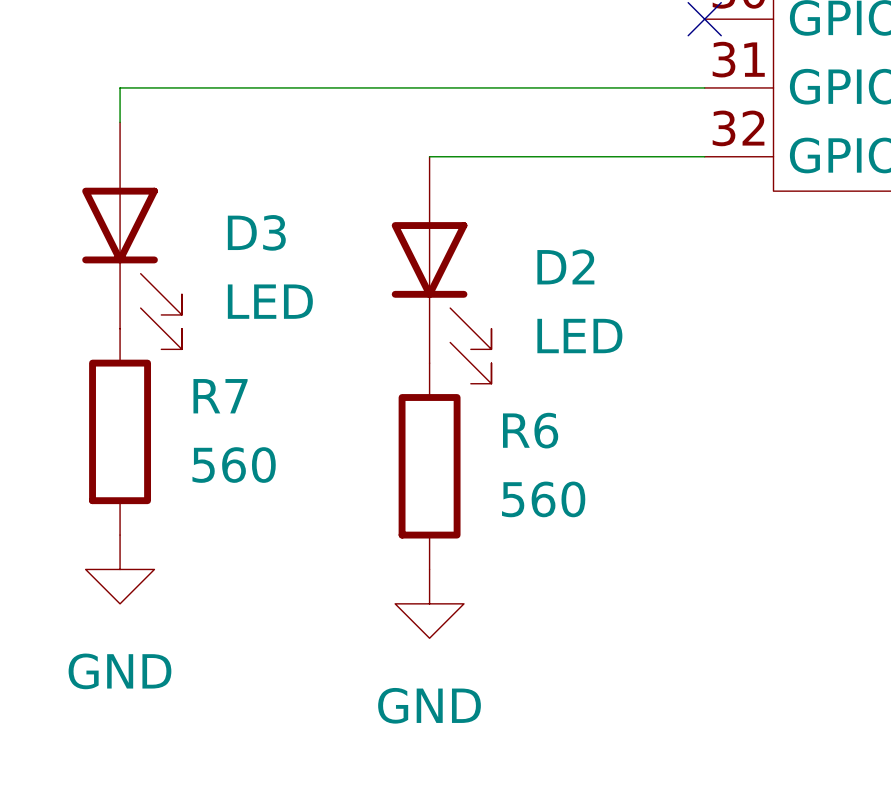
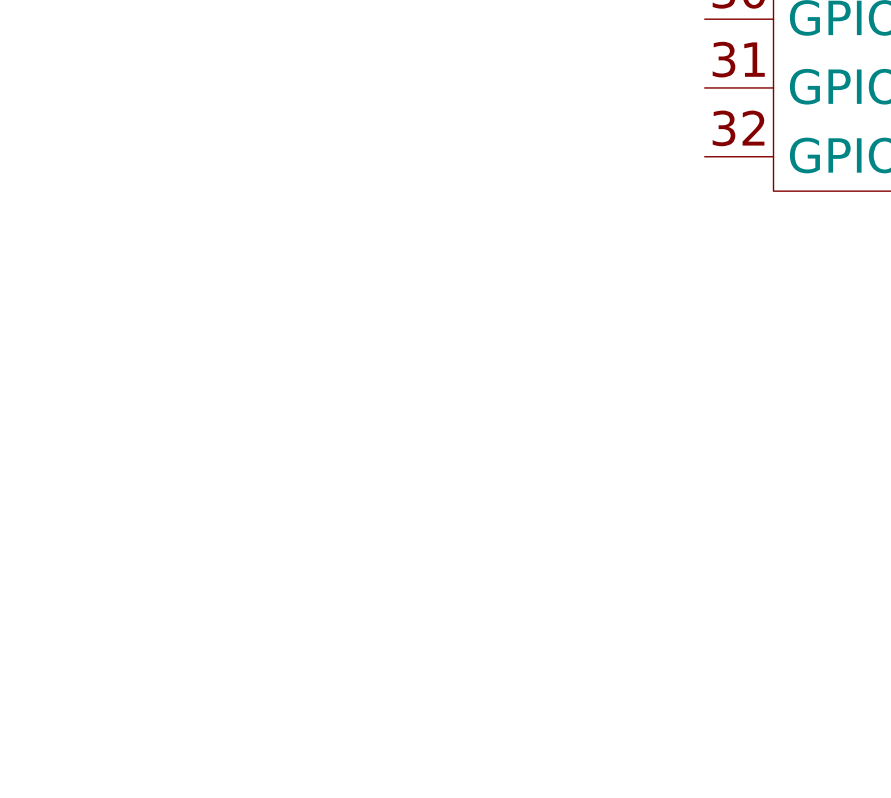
no-connect mark: (704, 19) -> none
wire: (704, 87) (120, 87) (120, 122) -> none
wire: (429, 156) (704, 156) -> none
D3: LED (132, 235) -> none
D2: LED (441, 270) -> none
R7: 560 (120, 431) -> none
R6: 560 (429, 466) -> none
power symbol: GND (120, 569) -> none
power symbol: GND (429, 603) -> none

